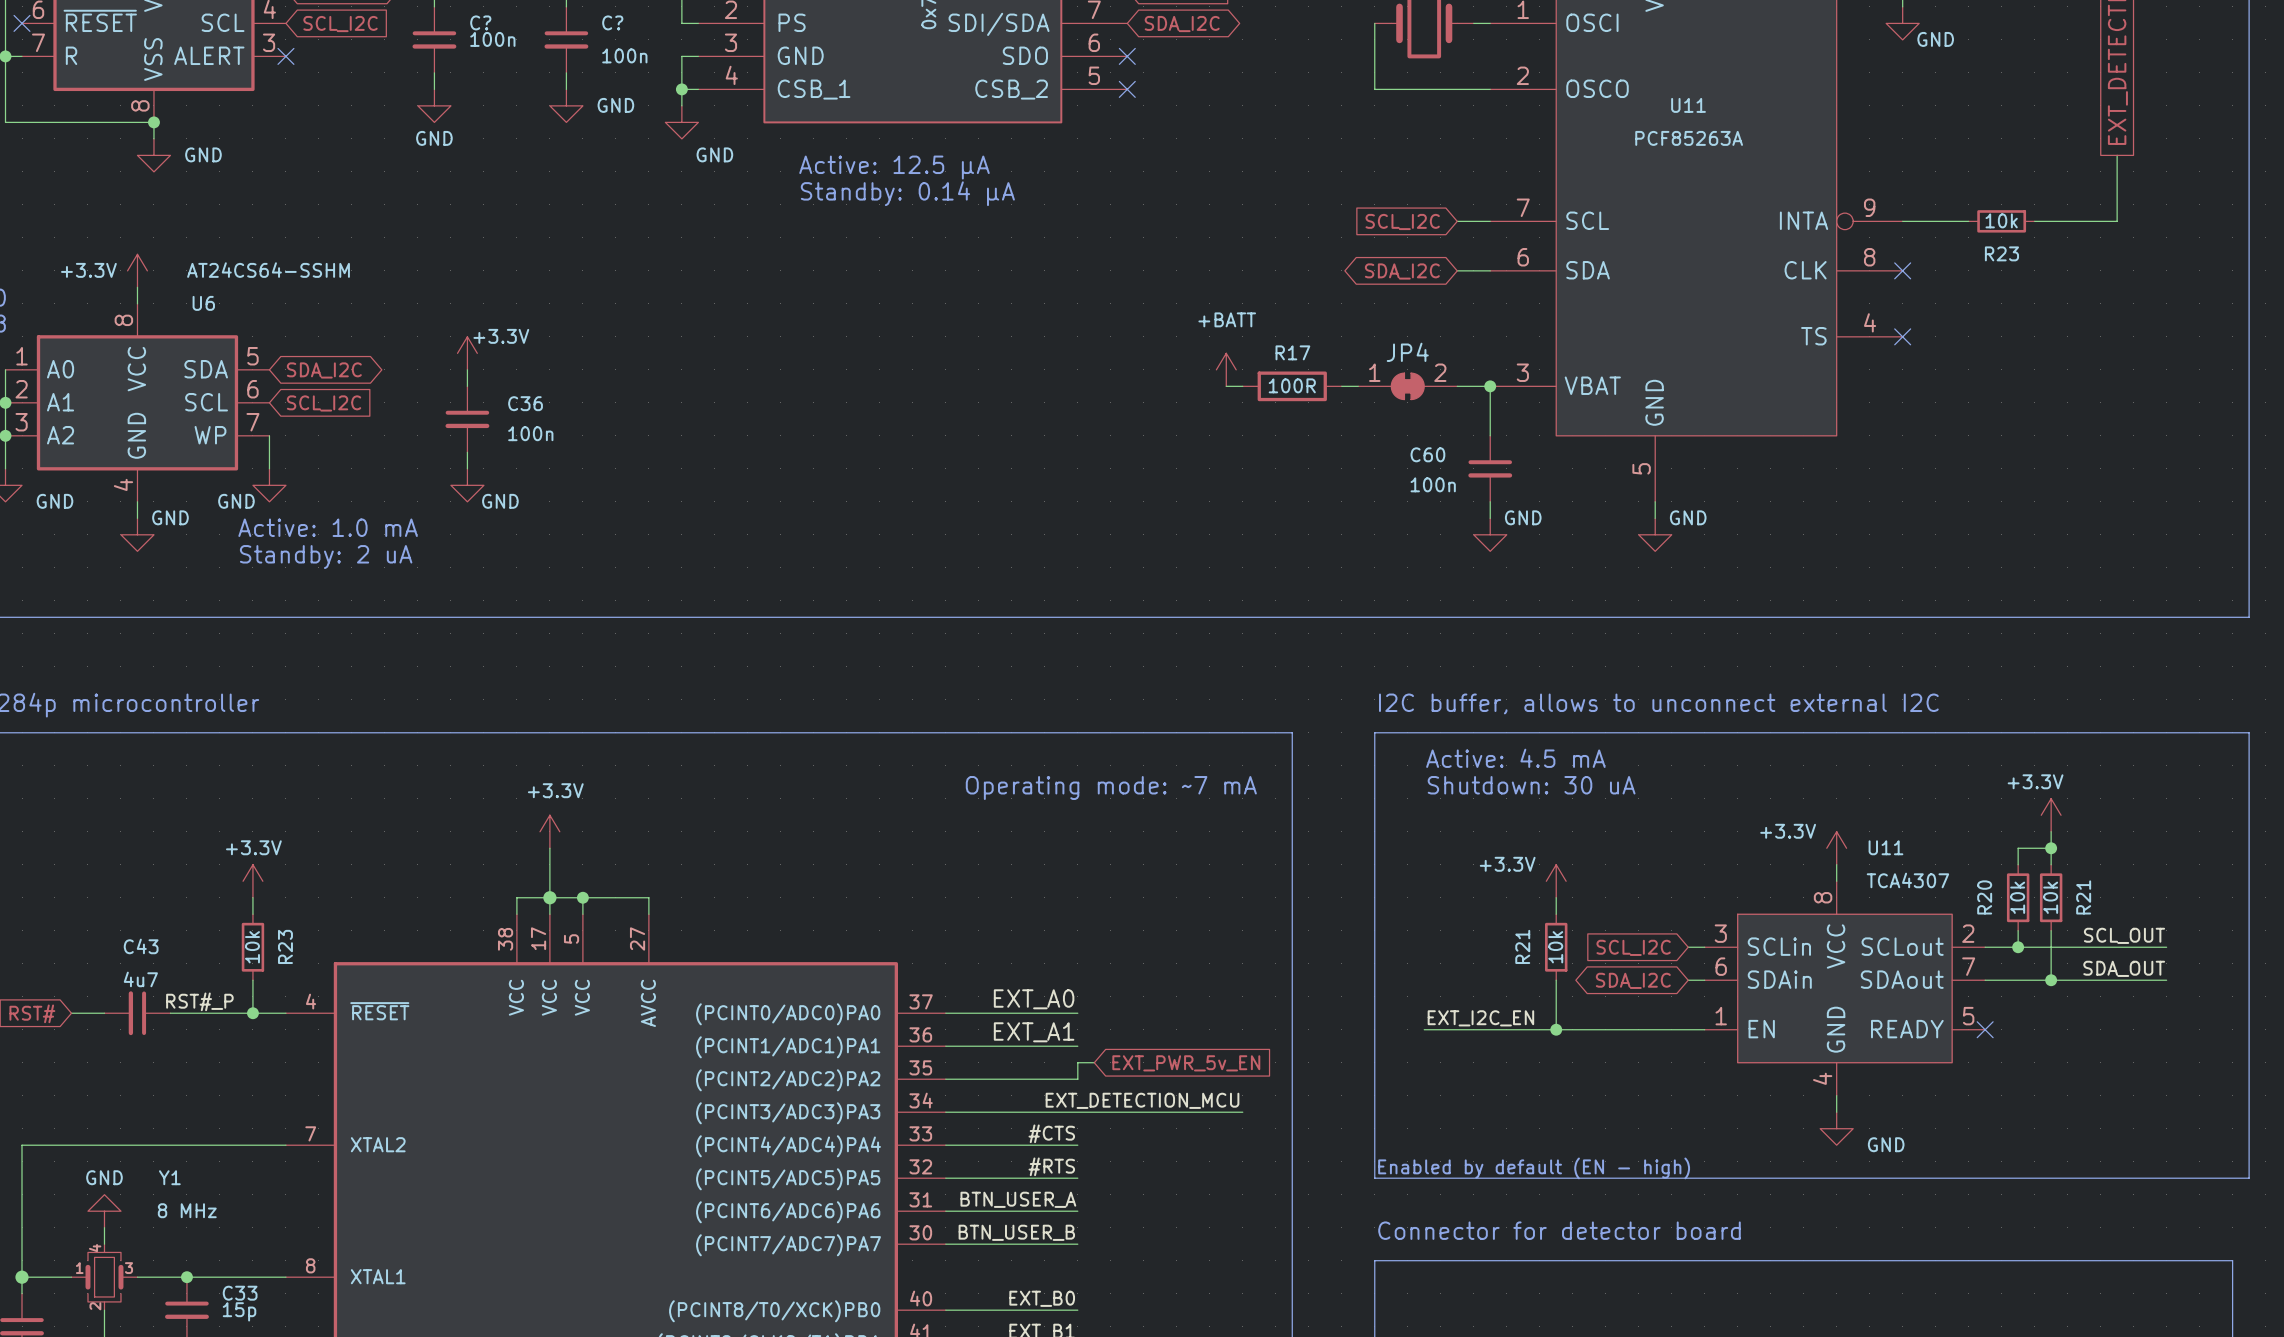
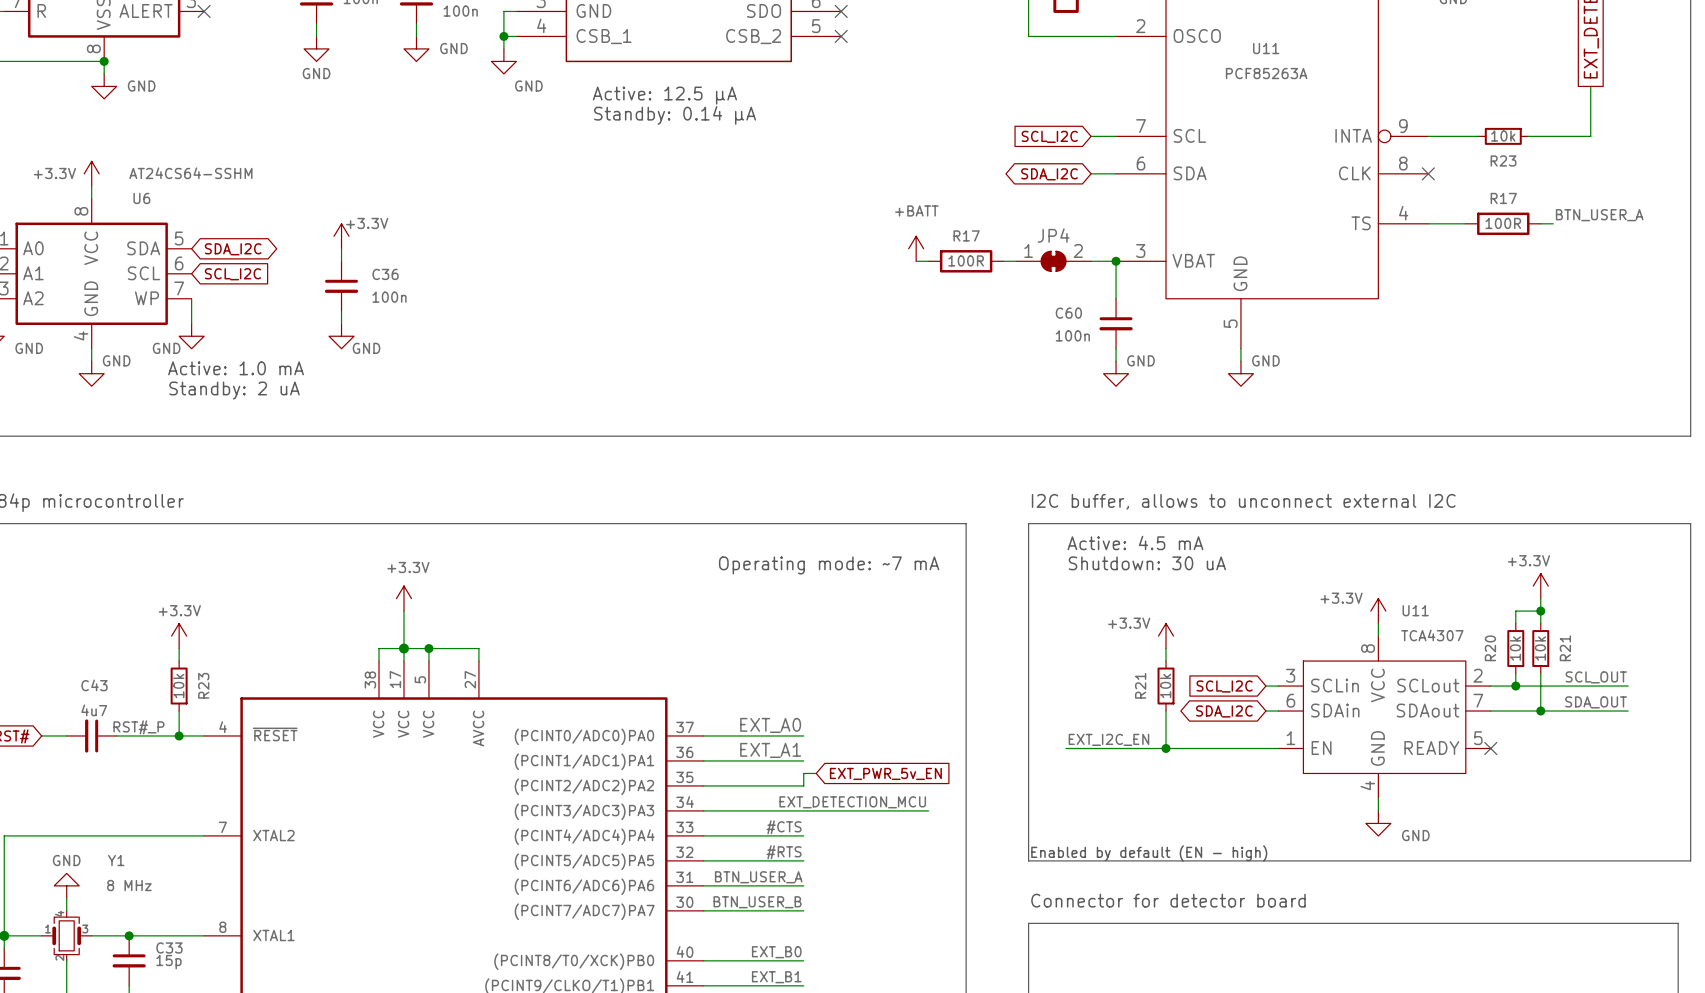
label: none -> BTN_USER_A (1599, 215)
wire: none -> (1428, 223) (1465, 223)
no-connect mark: (1902, 336) -> none
R17: none -> 100R (1503, 223)
wire: none -> (1540, 223) (1553, 223)

